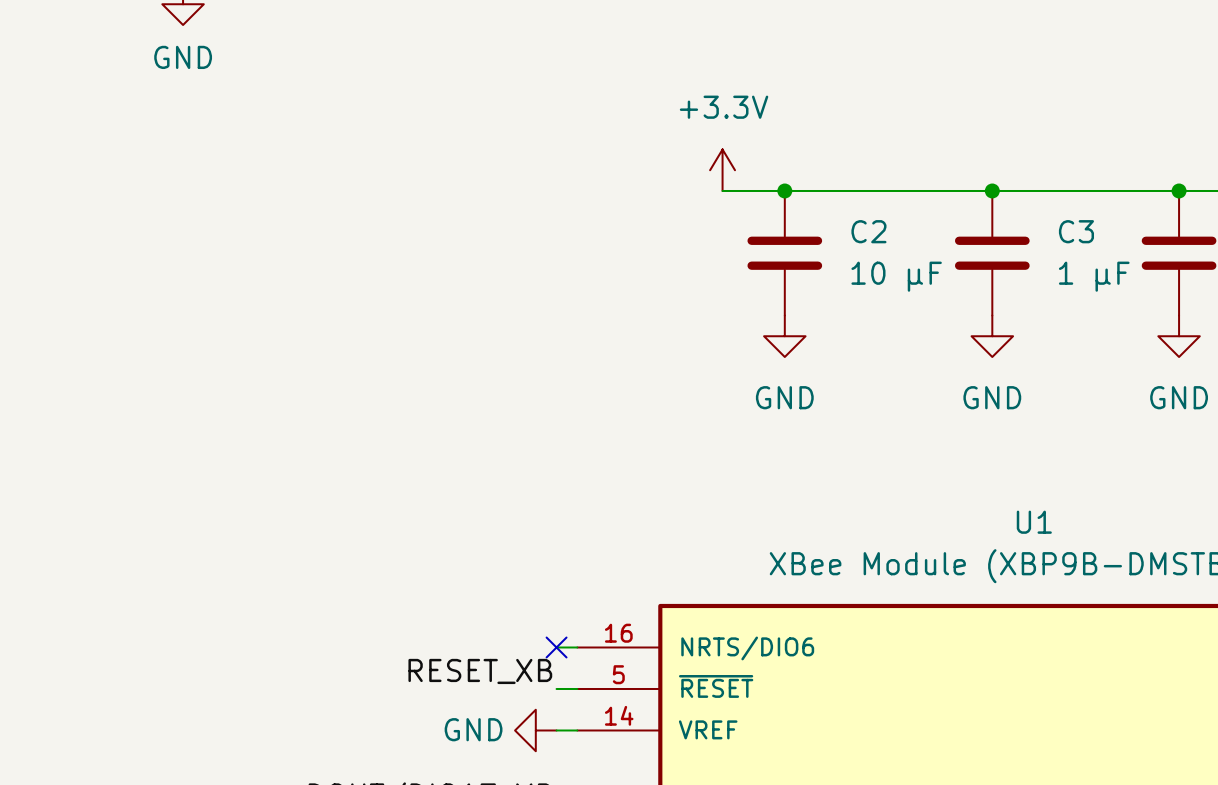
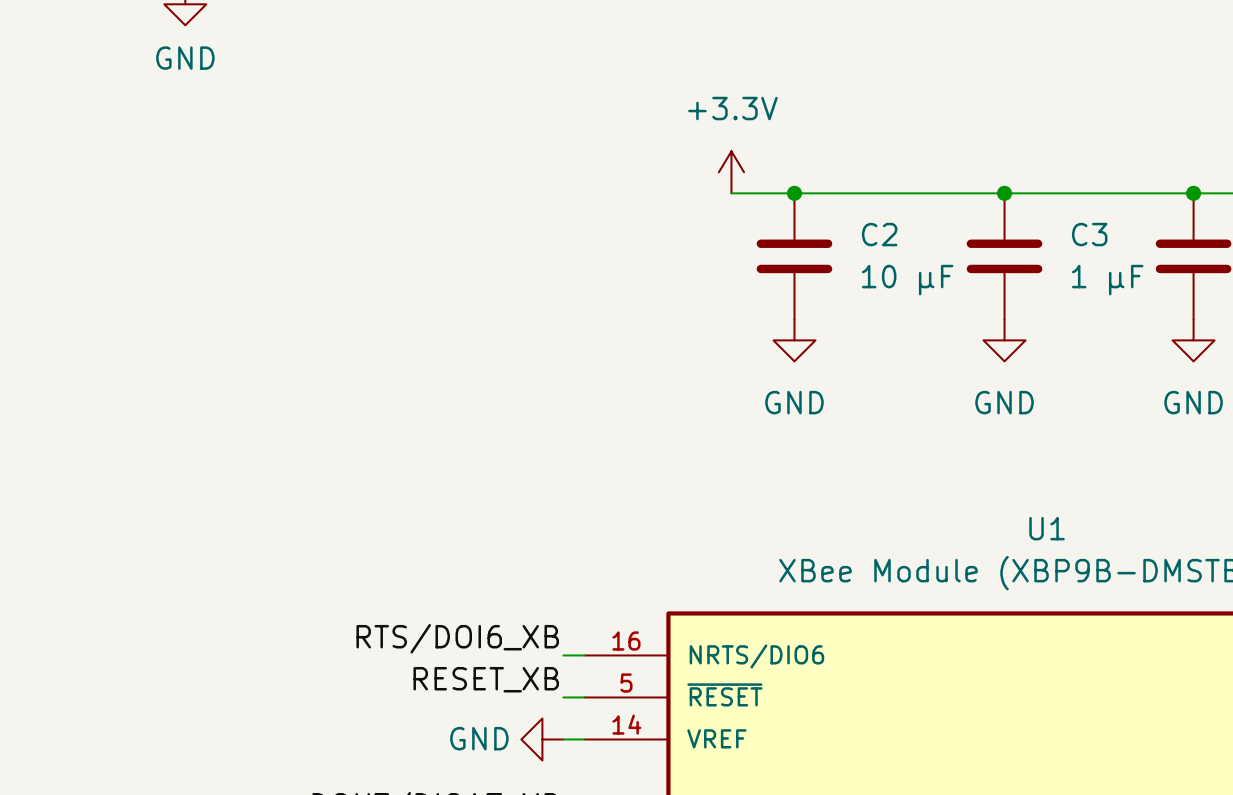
label: none -> RTS/DOI6_XB (457, 638)
no-connect mark: (556, 647) -> none

